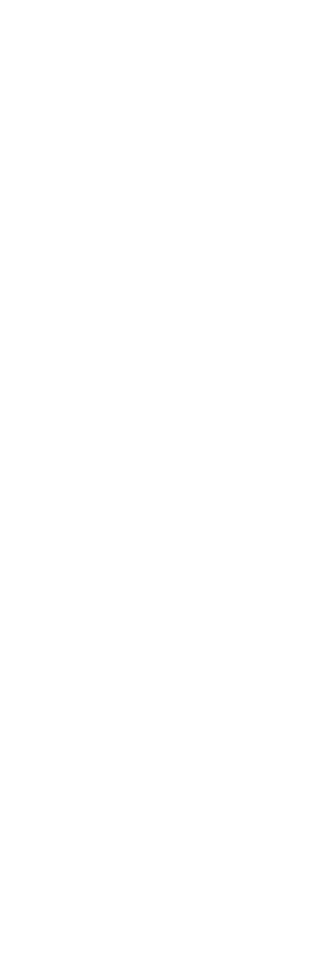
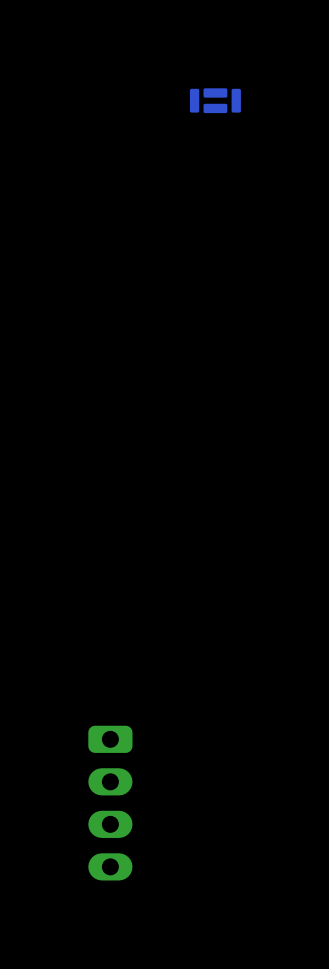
part: none -> (215, 100)
part: none -> (110, 803)

